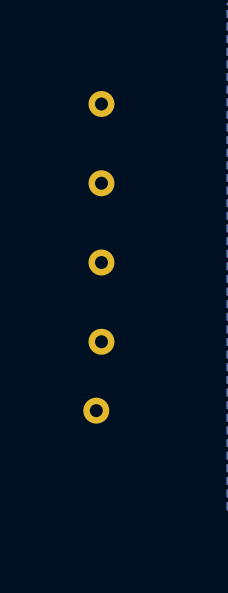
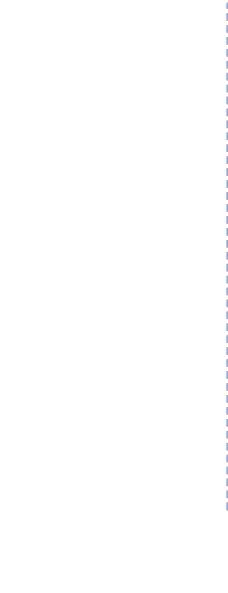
part: (101, 103) -> none
part: (101, 183) -> none
part: (101, 262) -> none
part: (101, 341) -> none
part: (96, 410) -> none

